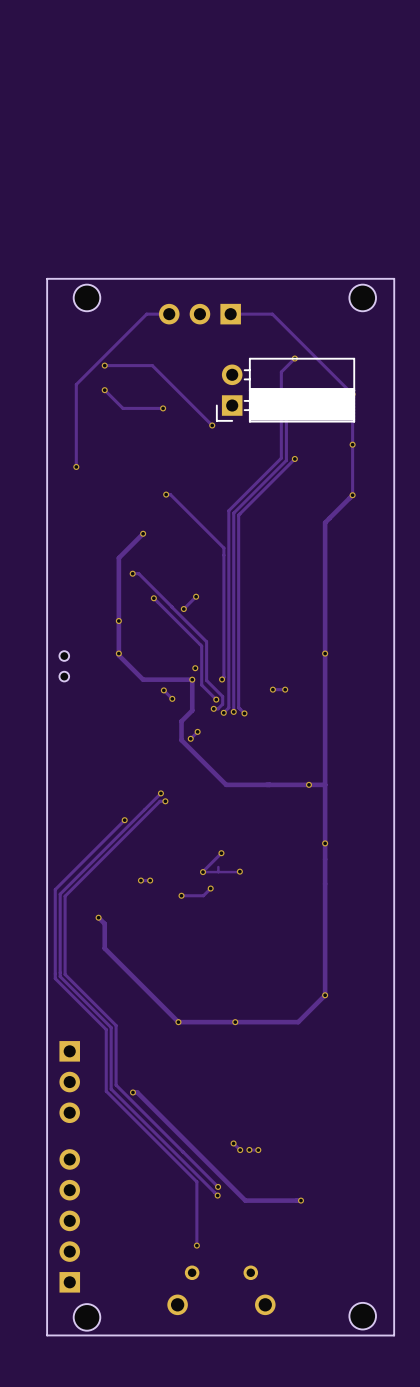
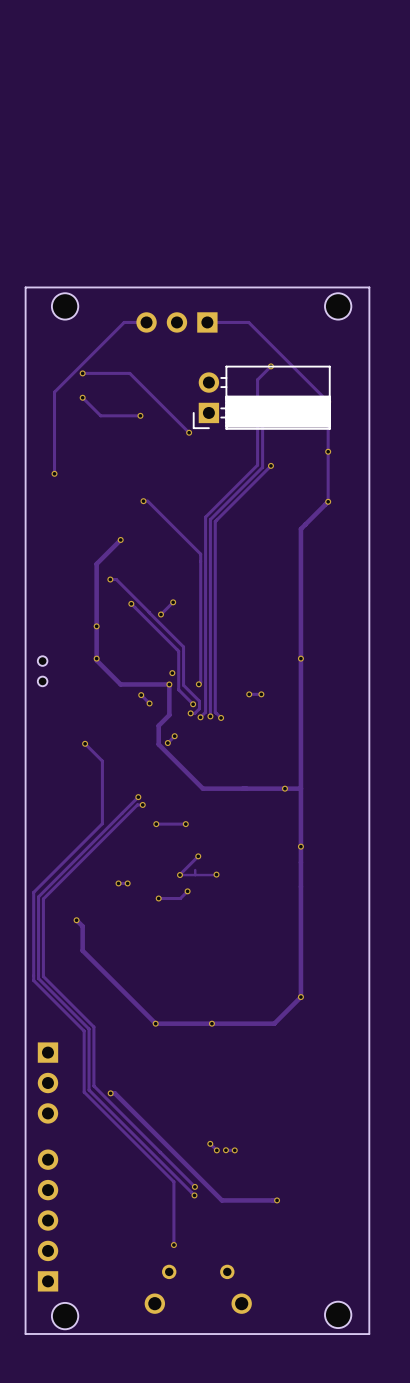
track: none -> (85, 743) (102, 761) (102, 823)
via: none -> (85, 743)
via: (124, 820) -> none
via: none -> (156, 824)
track: none -> (185, 824) (156, 824)
via: none -> (185, 824)

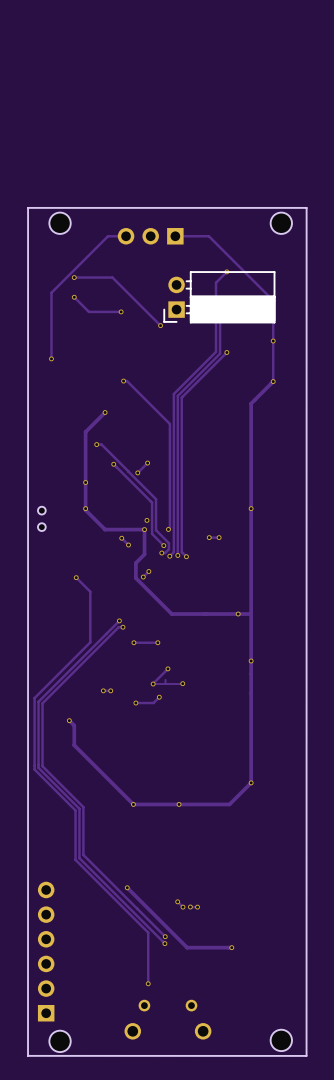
part: (47, 1083) -> none
track: (110, 1093) (114, 1093) (148, 1126) -> none
via position: (110, 1093) -> (127, 887)
part: none -> (46, 951)

